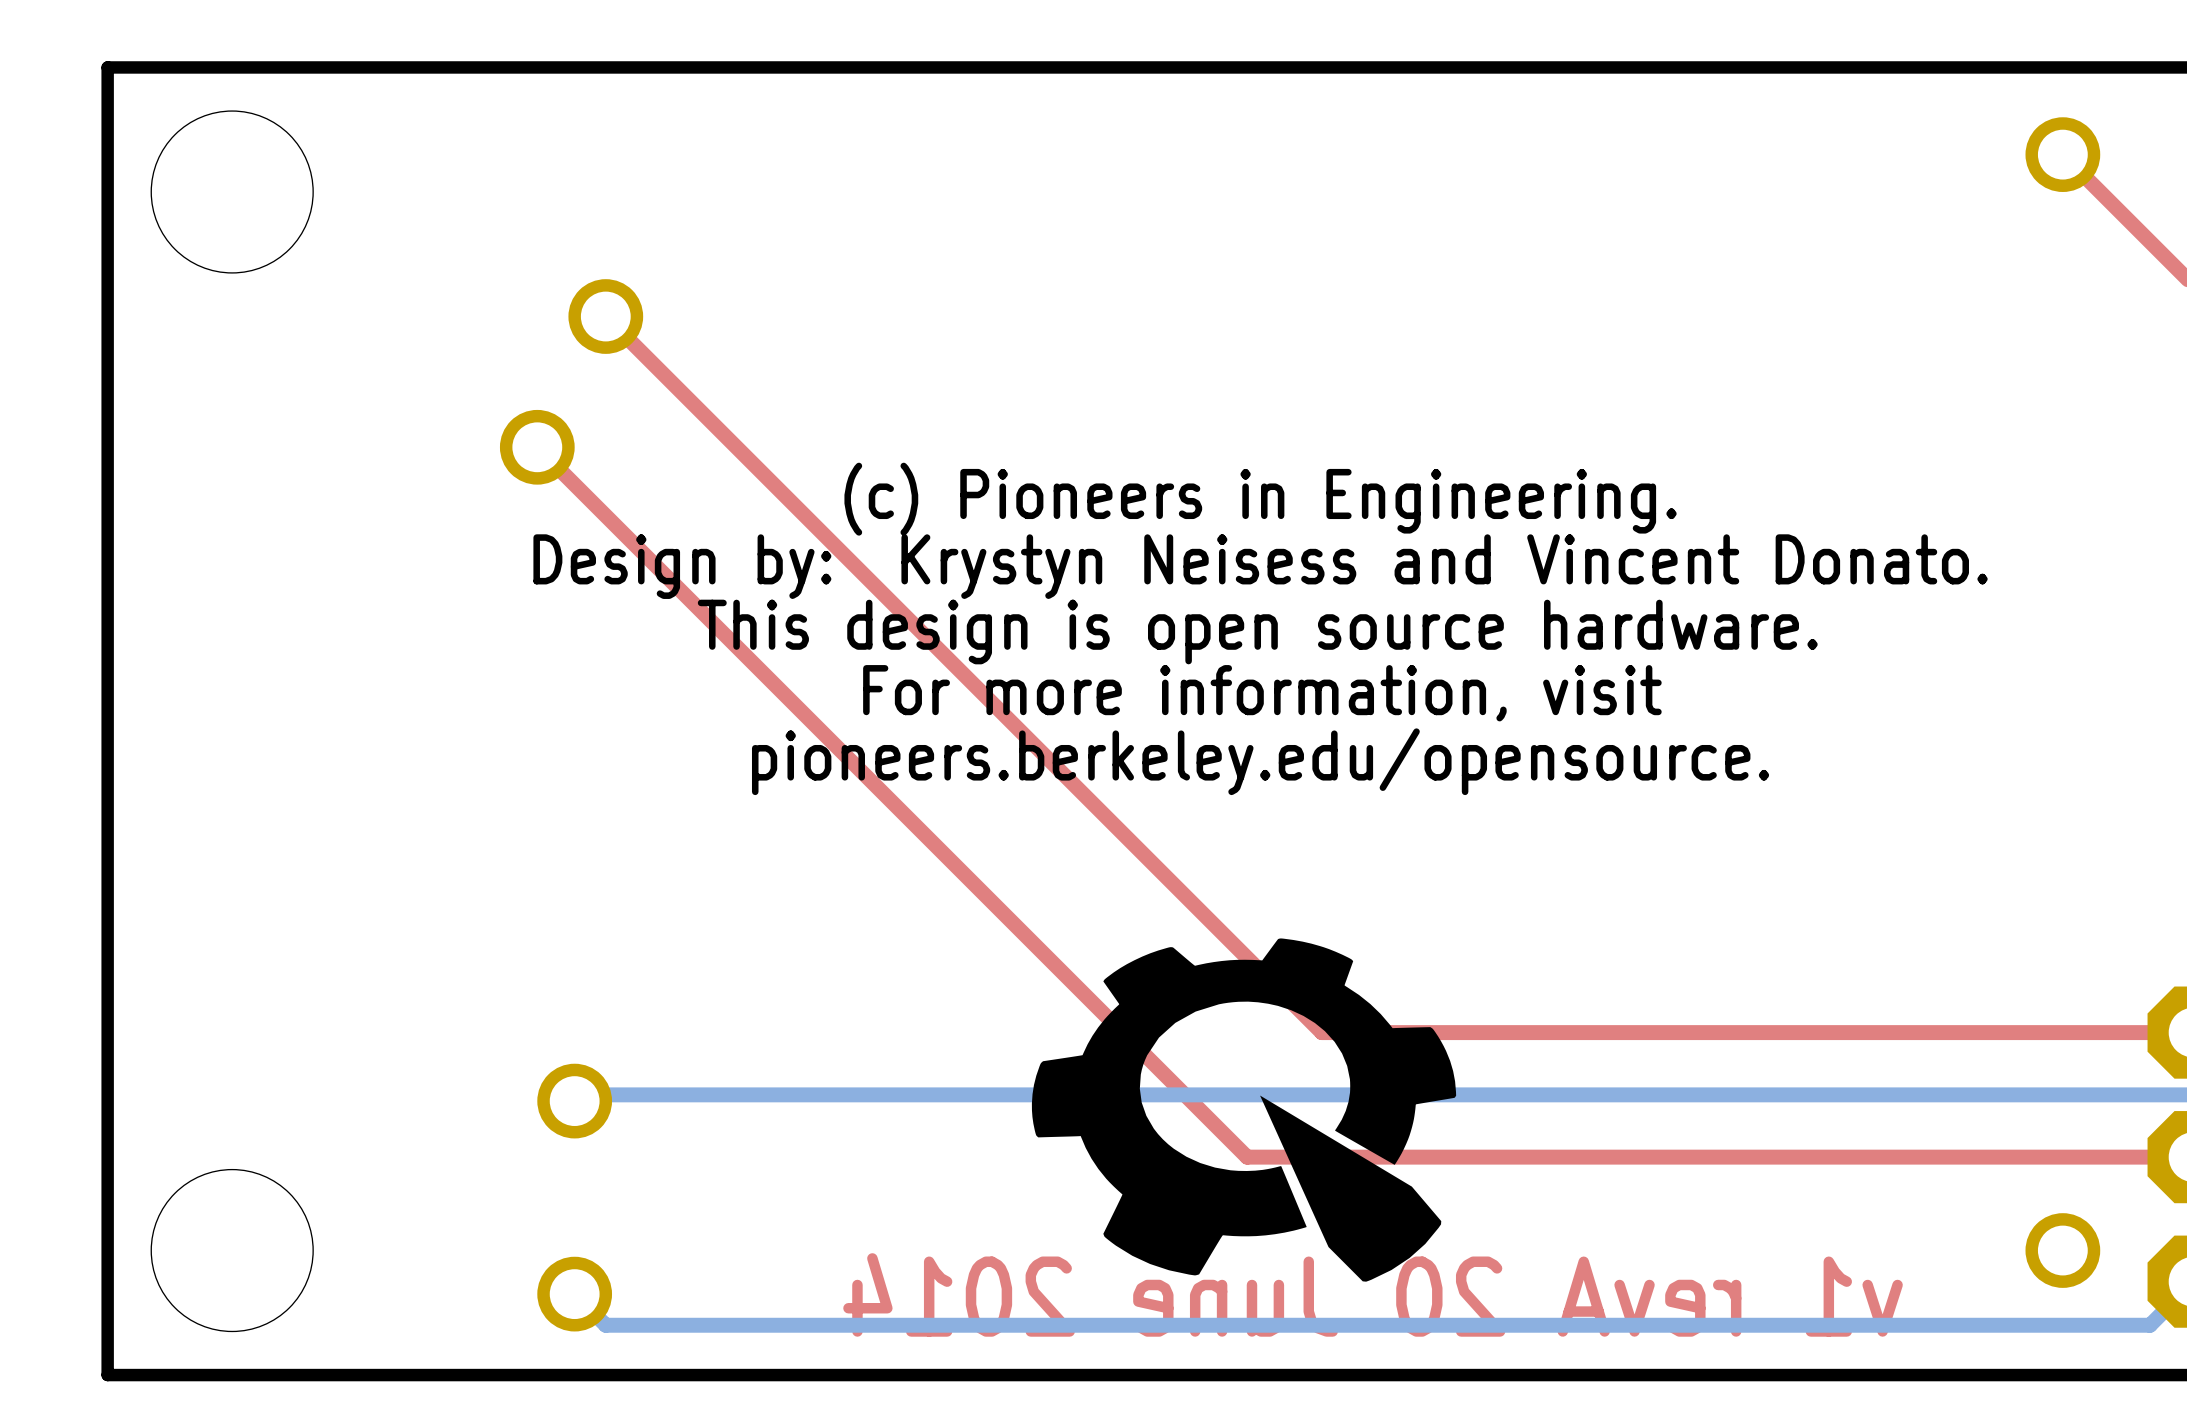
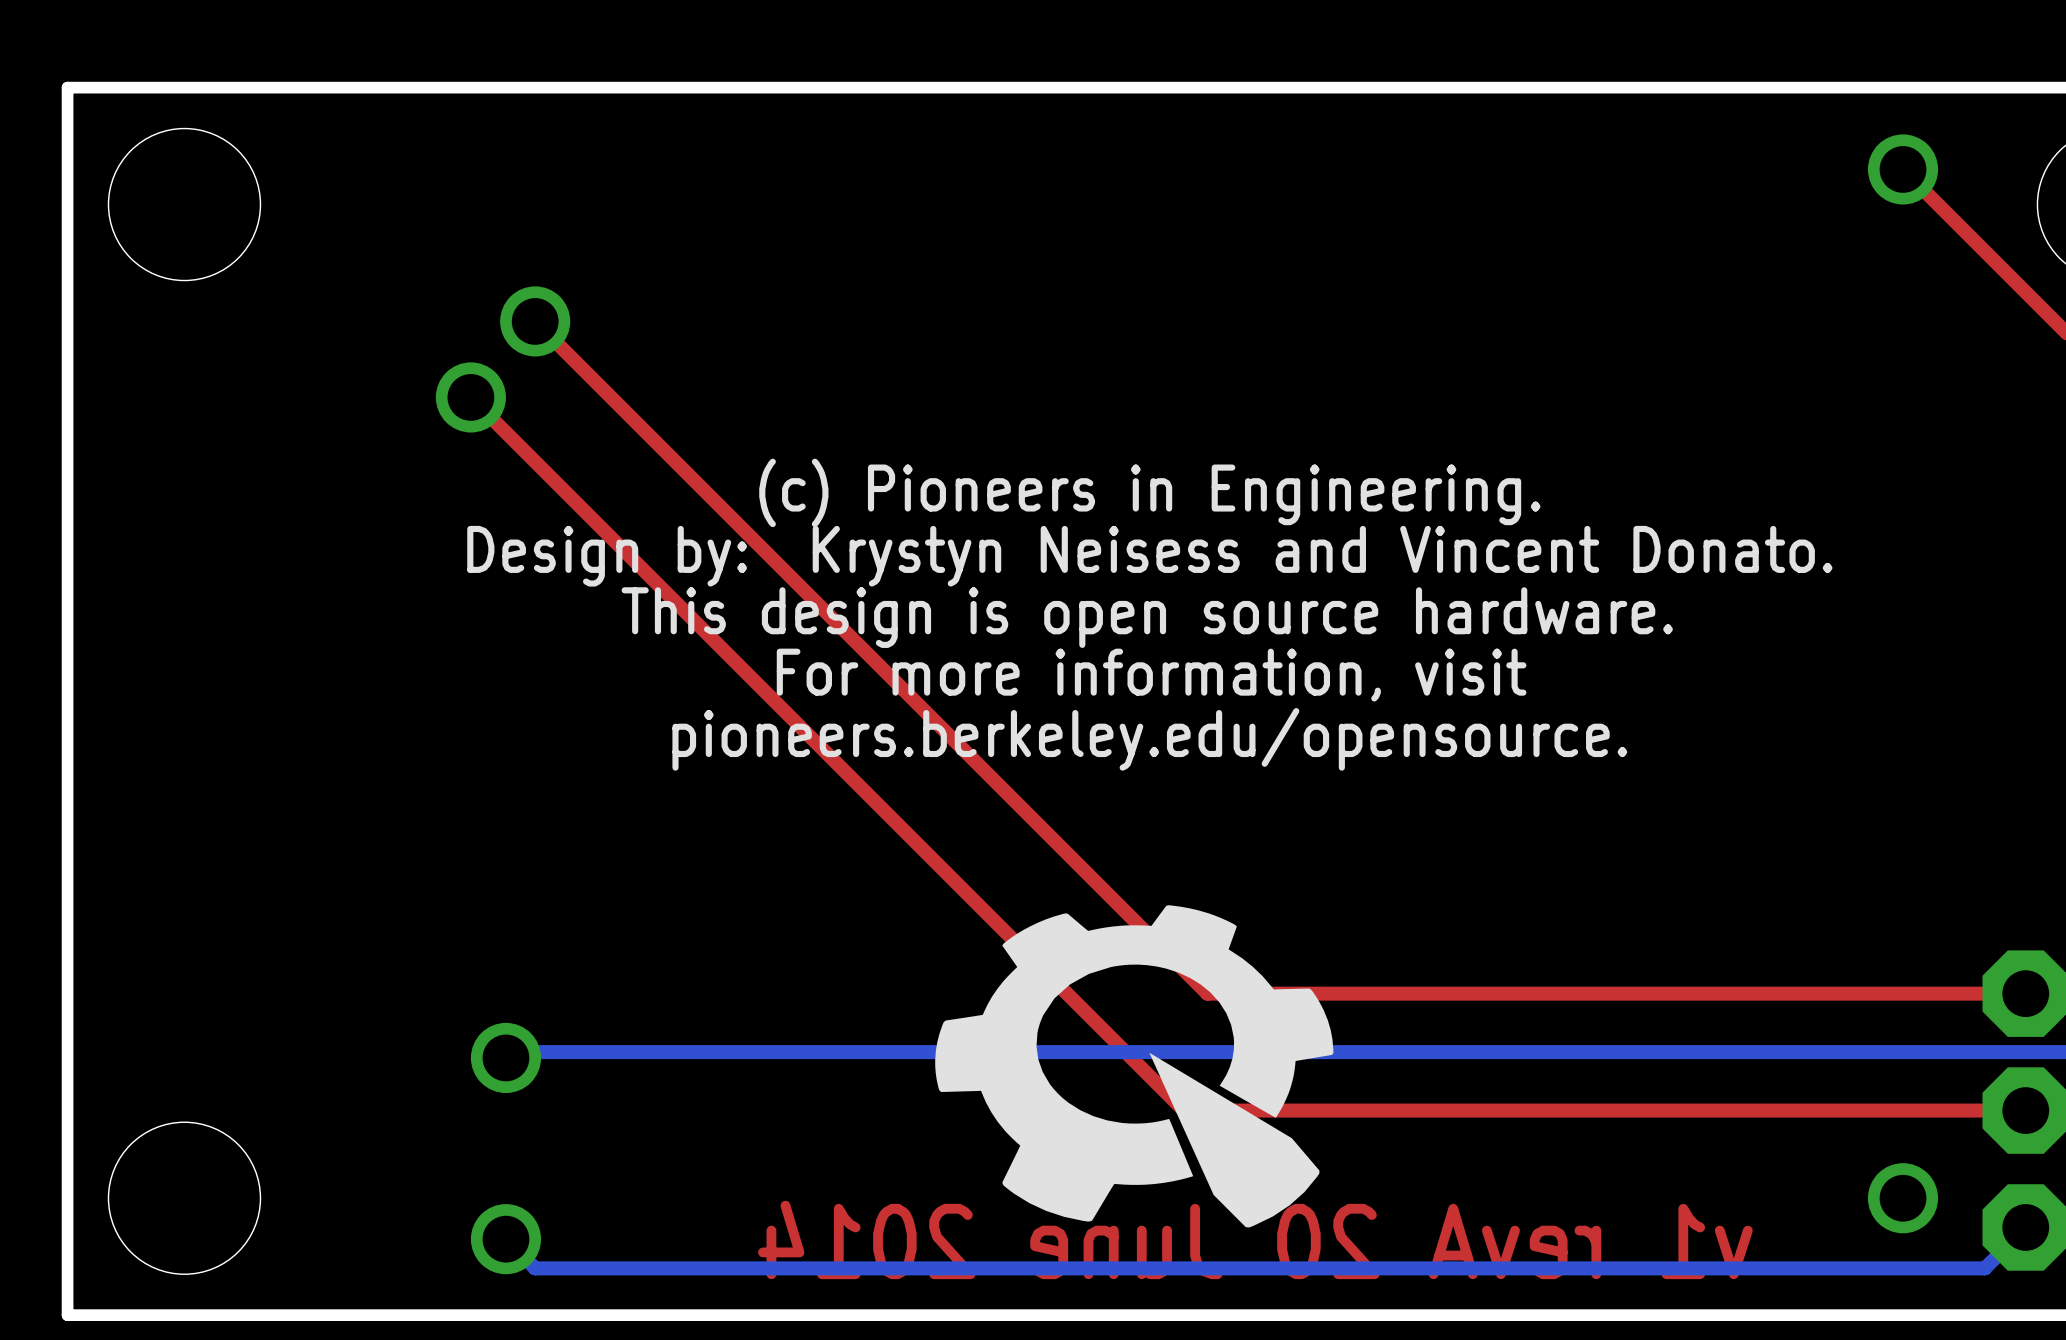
top track: (537, 447) (1247, 1157) (1296, 1157) -> (470, 397) (1184, 1110)
part position: (537, 447) -> (470, 397)

